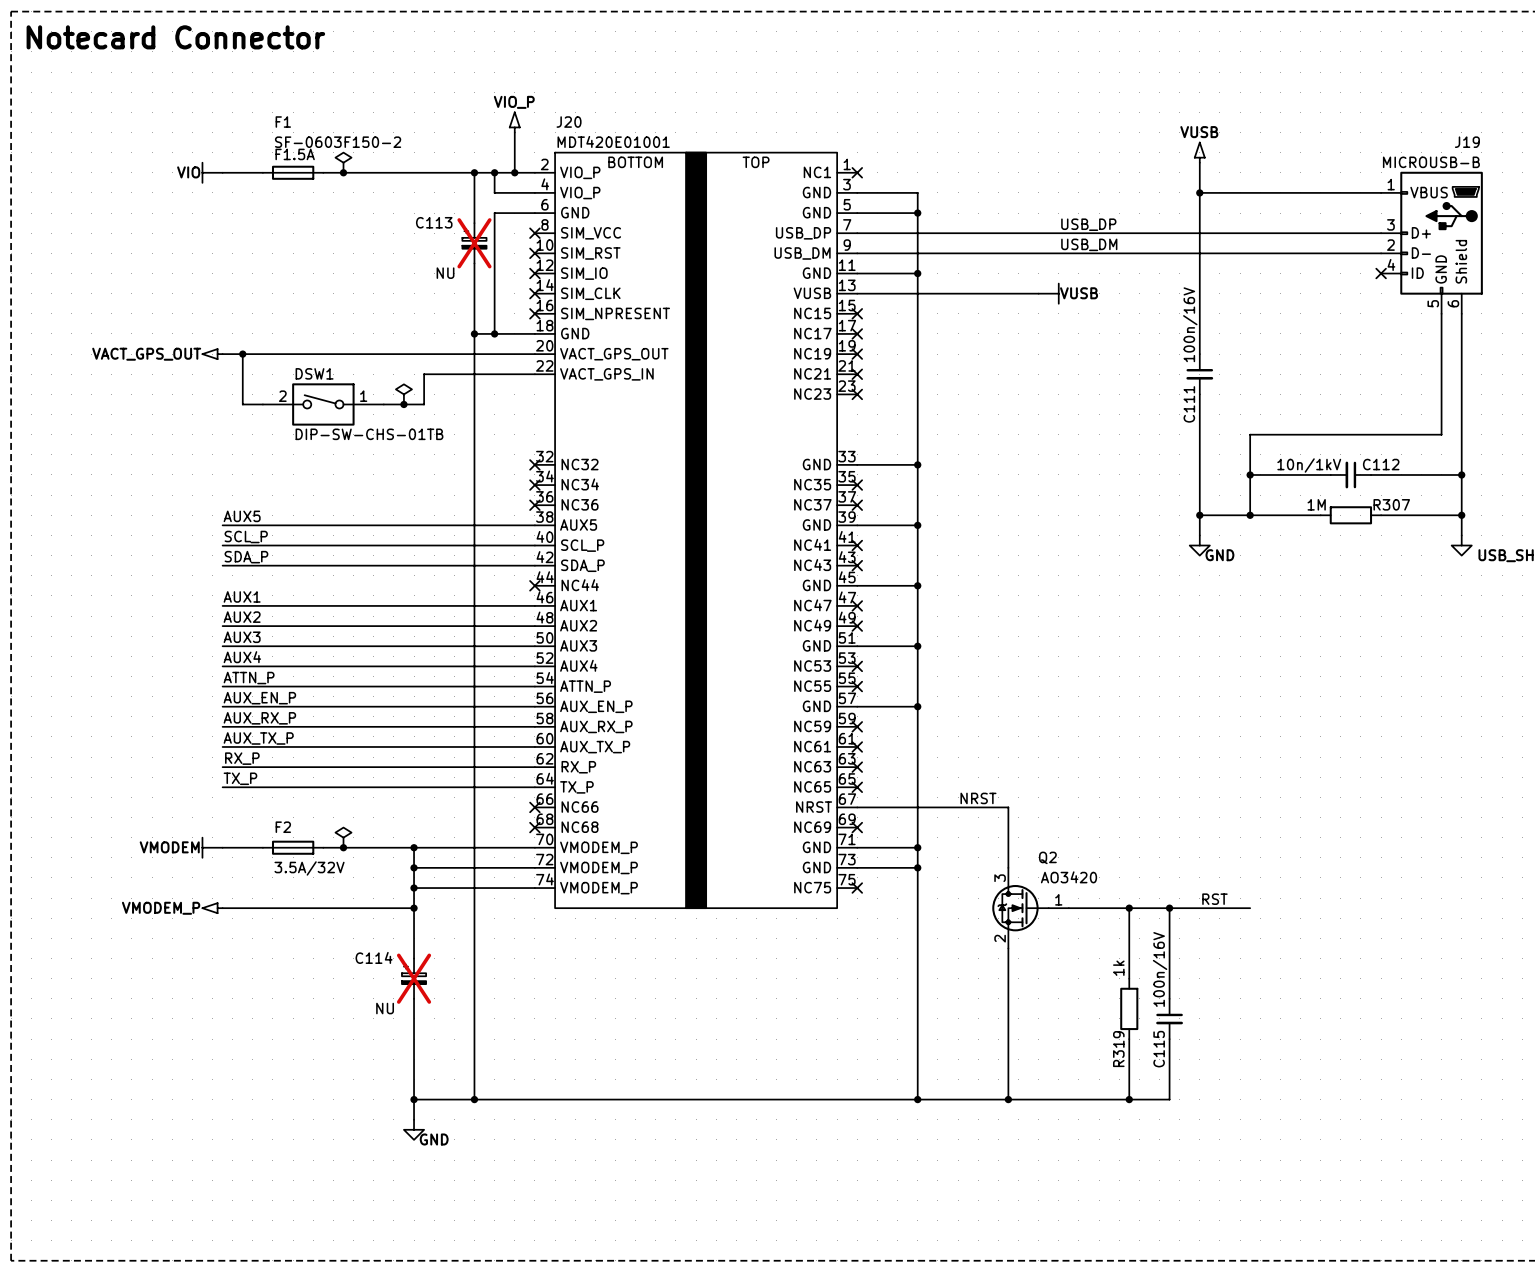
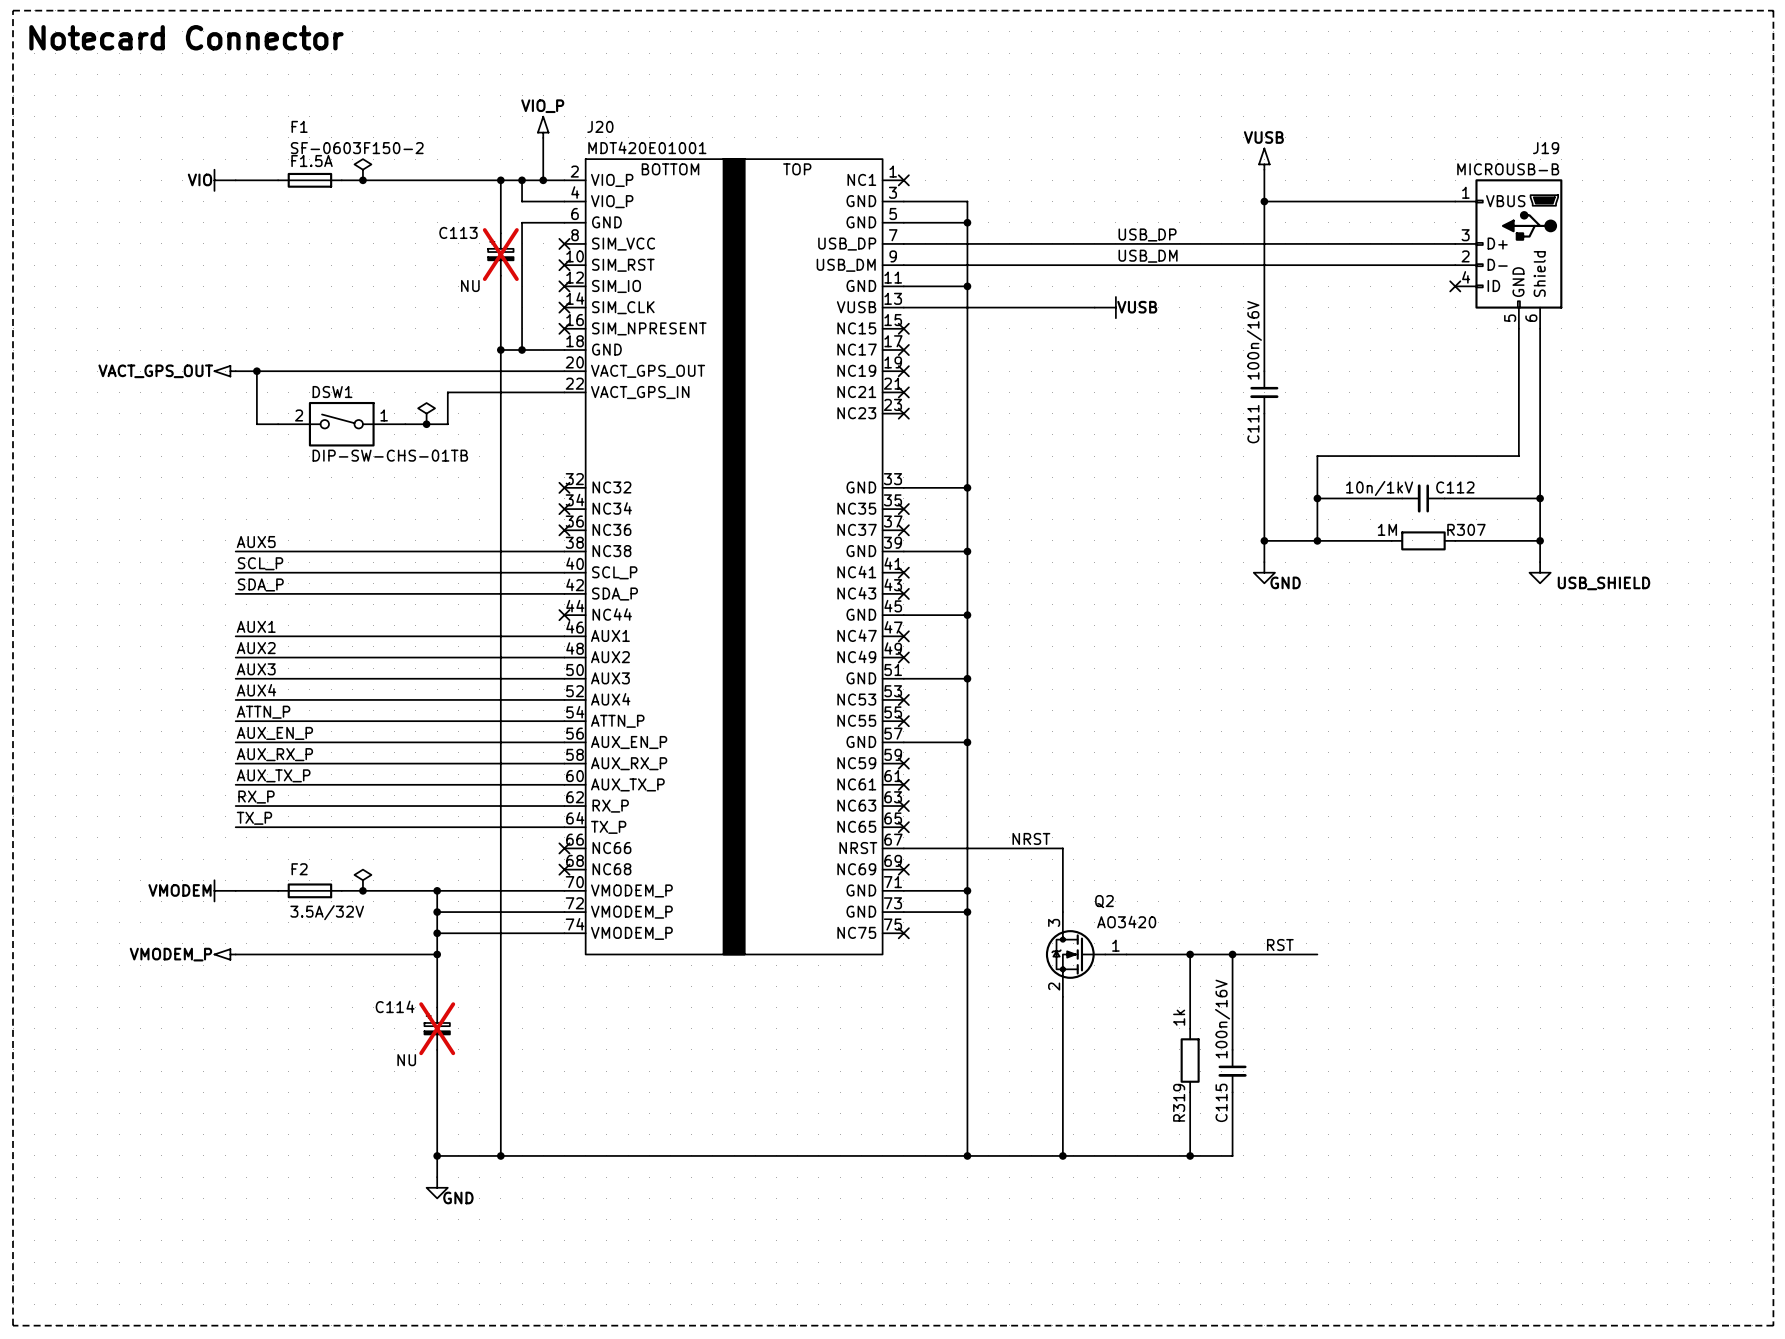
J20 pin name: AUX5 (578, 524) -> NC38 (611, 551)

